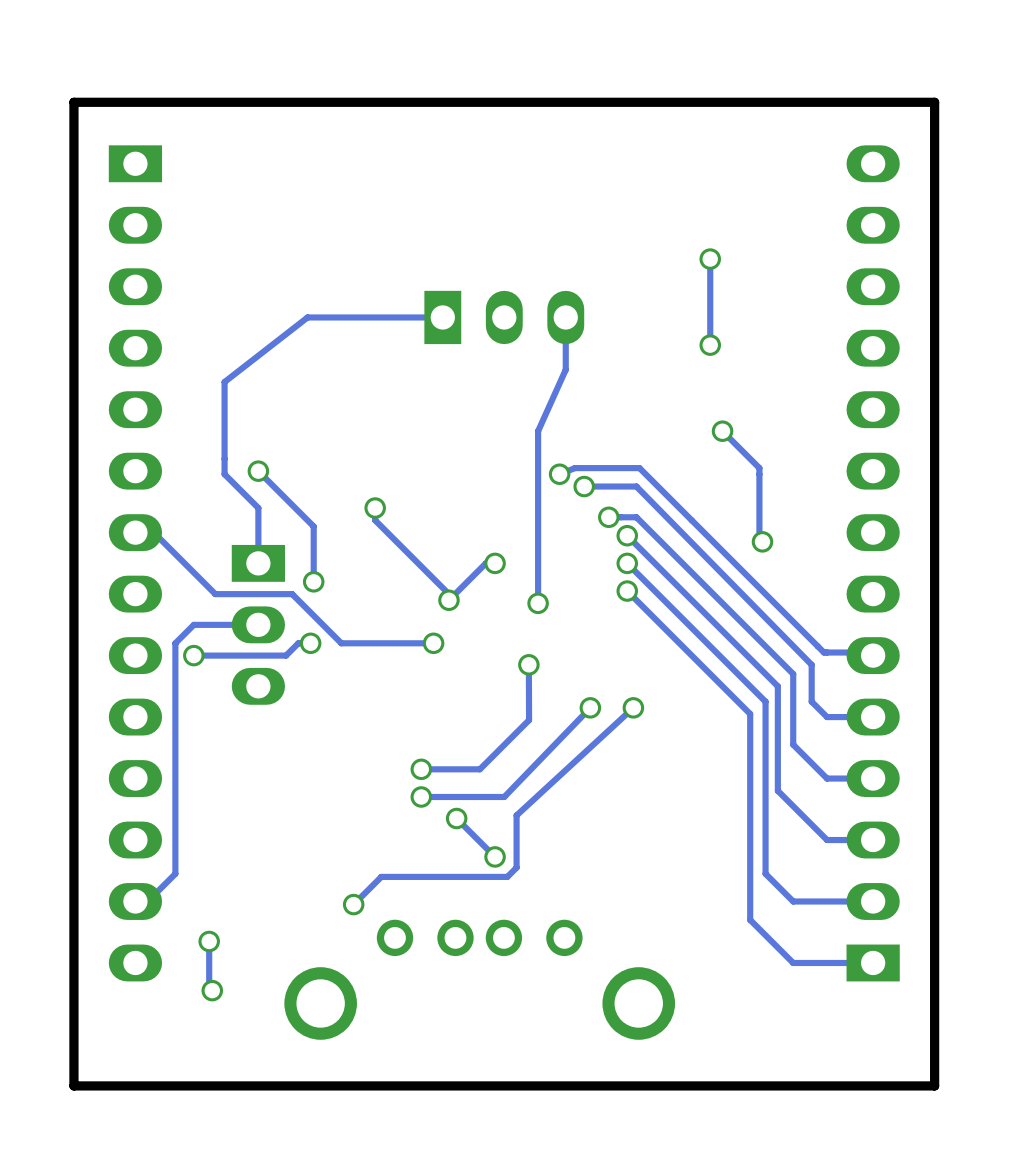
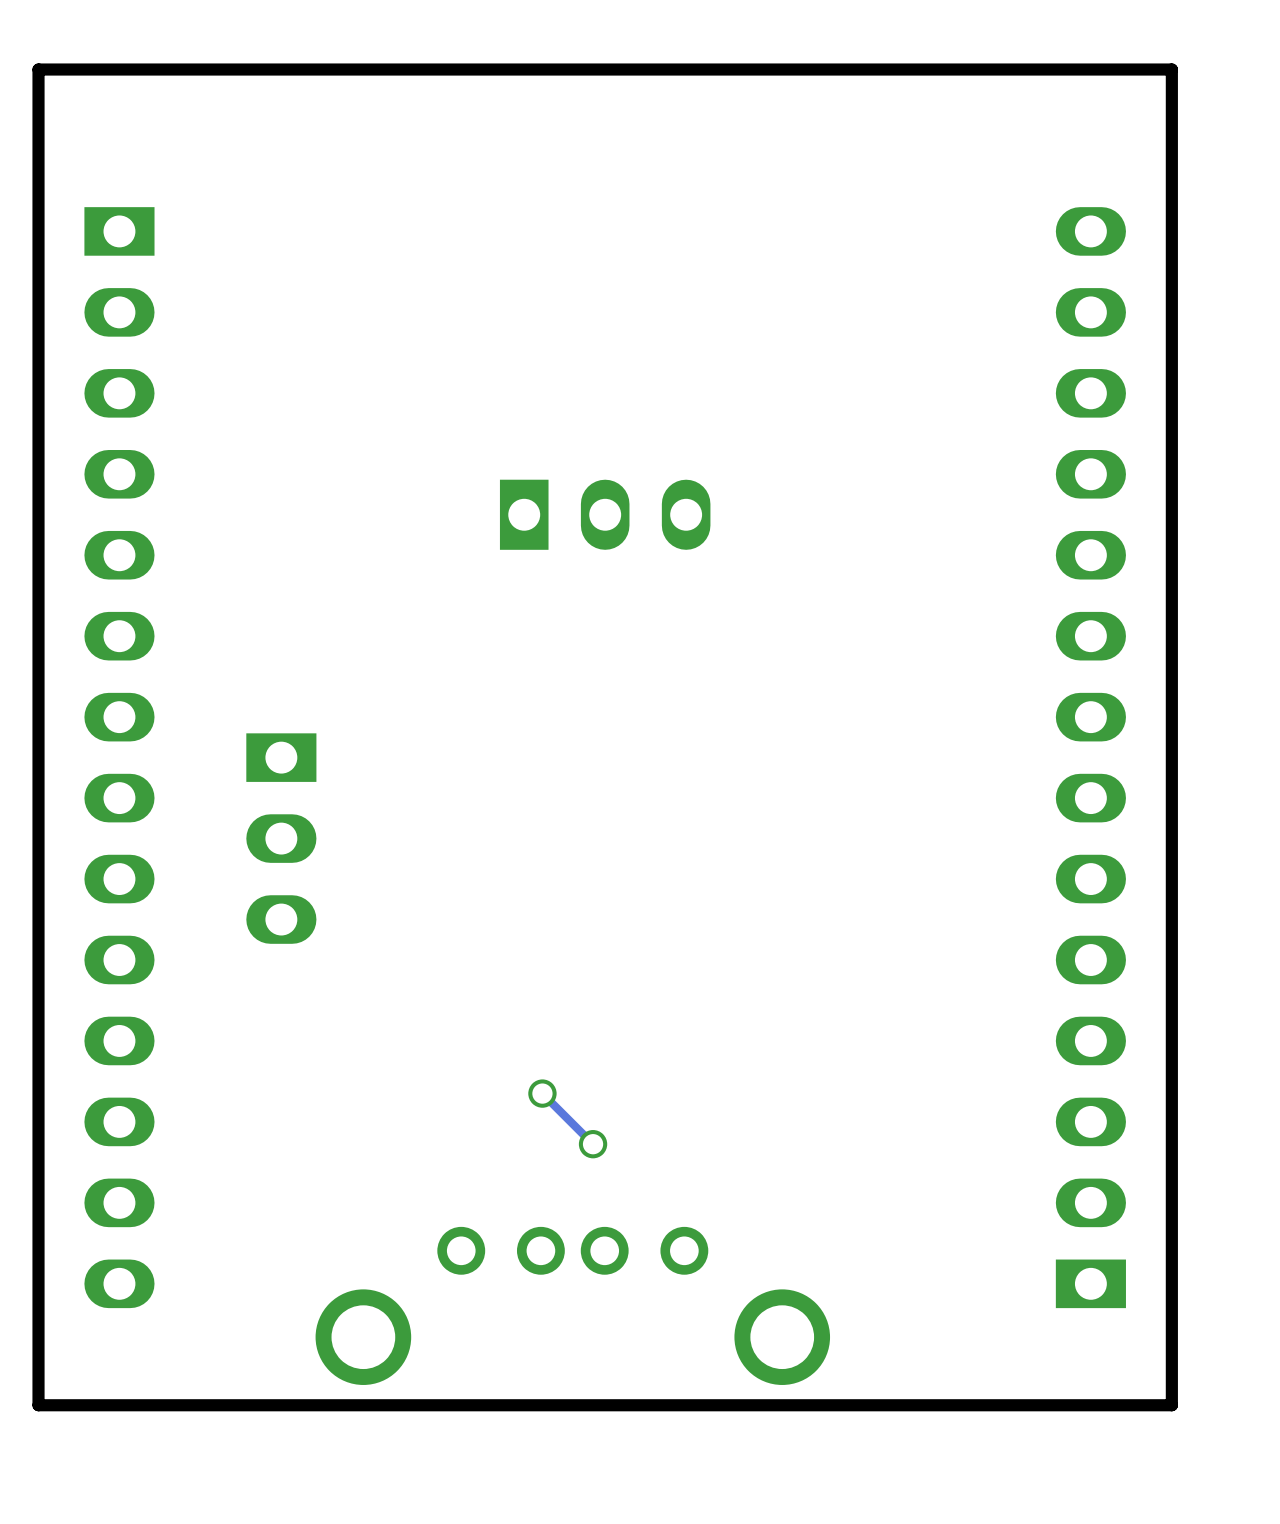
board edge: (934, 102) (73, 102) -> (1171, 150) (1171, 69) (38, 69) (38, 150)
track: (710, 259) (710, 345) -> none
via: (710, 259) -> none
track: (442, 317) (307, 317) (224, 382) (224, 474) (258, 508) (258, 563) -> none
part position: (504, 317) -> (605, 514)
track: (565, 317) (565, 369) (538, 431) (538, 603) -> none
via: (710, 345) -> none
track: (722, 431) (759, 468) (759, 538) (762, 541) -> none
via: (722, 431) -> none
track: (258, 471) (313, 526) (313, 581) -> none
via: (258, 471) -> none
track: (559, 474) (574, 468) (639, 468) (823, 652) (870, 652) (873, 655) -> none
via: (559, 474) -> none
track: (581, 486) (636, 486) (811, 664) (811, 701) (827, 717) (873, 717) -> none
via: (584, 486) -> none
track: (375, 508) (375, 520) (448, 594) (448, 600) (485, 563) (495, 563) -> none
via: (375, 508) -> none
track: (608, 517) (636, 517) (793, 674) (793, 744) (827, 778) (873, 778) -> none
via: (608, 517) -> none
track: (135, 532) (153, 532) (215, 594) (292, 594) (341, 643) (433, 643) -> none
track: (627, 535) (777, 686) (777, 790) (827, 840) (873, 840) -> none
via: (627, 535) -> none
via: (762, 541) -> none
via: (495, 563) -> none
track: (627, 563) (765, 701) (765, 873) (793, 901) (873, 901) -> none
via: (627, 563) -> none
via: (313, 581) -> none
track: (627, 591) (750, 713) (750, 919) (793, 962) (873, 962) -> none
via: (627, 591) -> none
via: (448, 600) -> none
via: (538, 603) -> none
track: (258, 624) (193, 624) (175, 643) (175, 873) (147, 901) (135, 901) -> none
track: (310, 643) (298, 643) (286, 655) (193, 655) -> none
via: (310, 643) -> none
via: (433, 643) -> none
via: (193, 655) -> none
track: (528, 664) (529, 720) (479, 769) (421, 769) -> none
via: (528, 664) -> none
track: (590, 707) (504, 796) (421, 796) -> none
via: (590, 707) -> none
track: (633, 707) (516, 815) (516, 867) (507, 876) (381, 876) (353, 904) -> none
via: (633, 707) -> none
via: (421, 769) -> none
via: (421, 796) -> none
via: (353, 904) -> none
track: (209, 941) (209, 987) (212, 990) -> none
via: (209, 941) -> none
via: (212, 990) -> none
board edge: (934, 1055) (934, 1085) (73, 1085) (73, 1055) -> (1171, 1405) (38, 1405)

